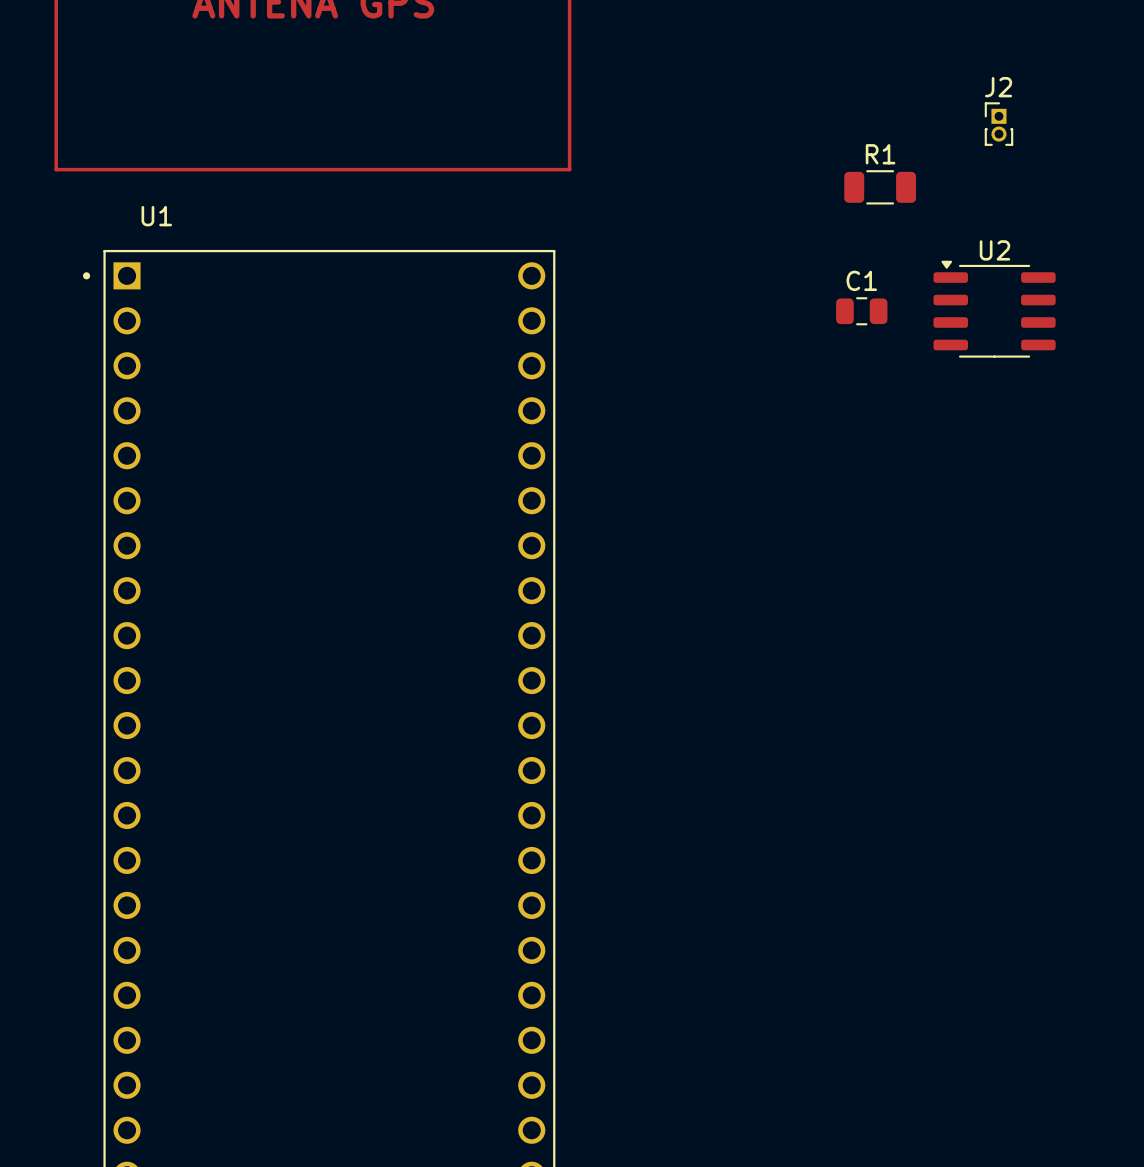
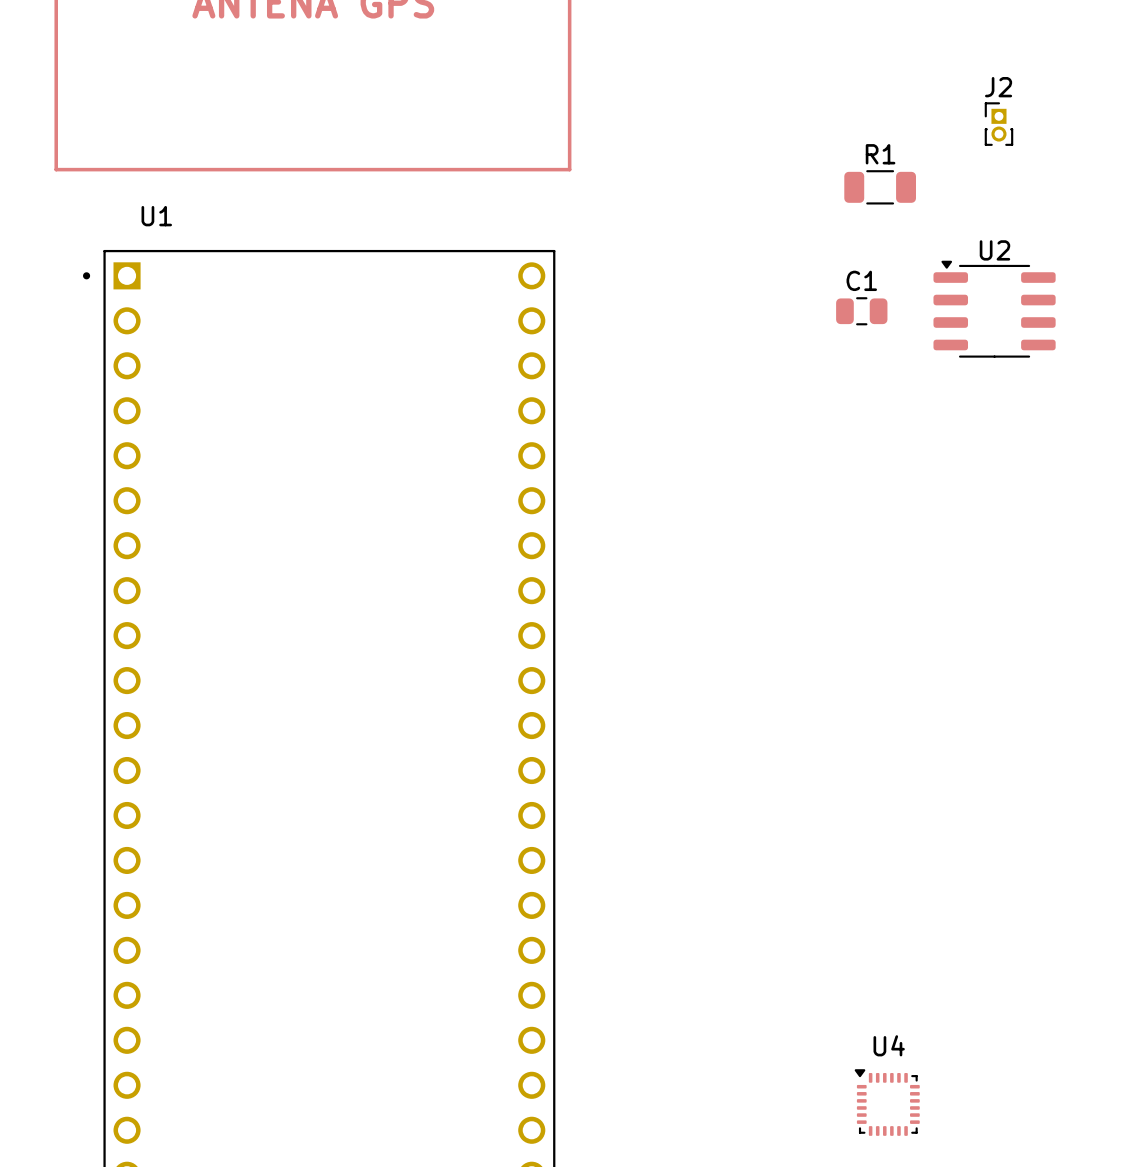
U4: none -> (887, 1102)

